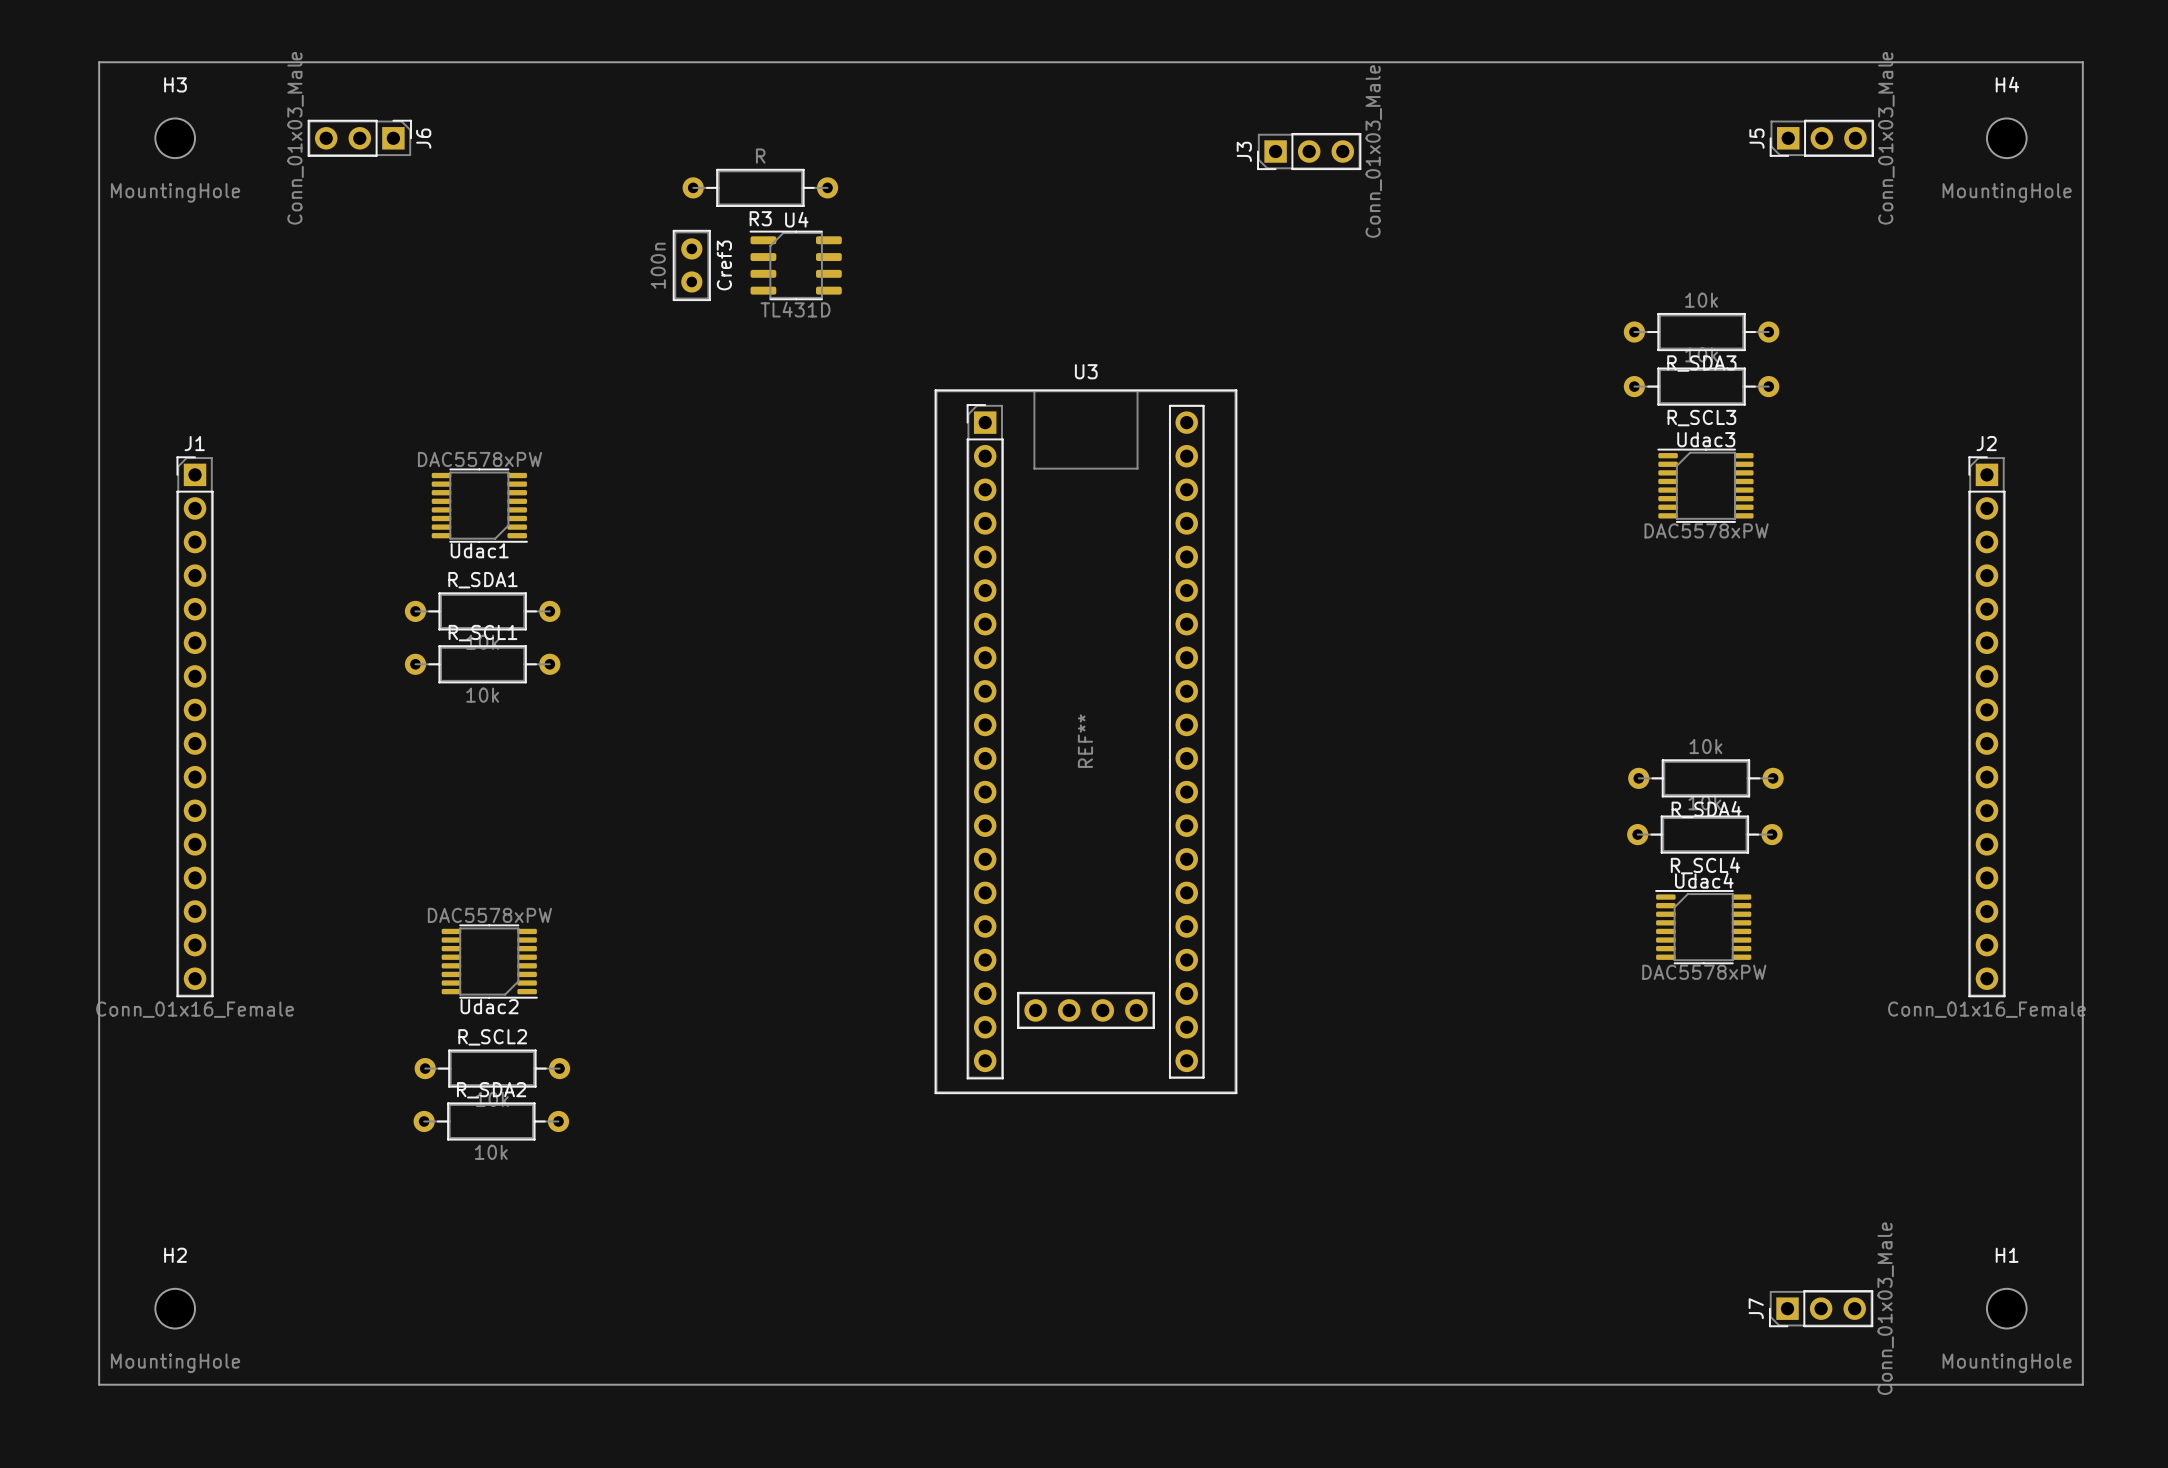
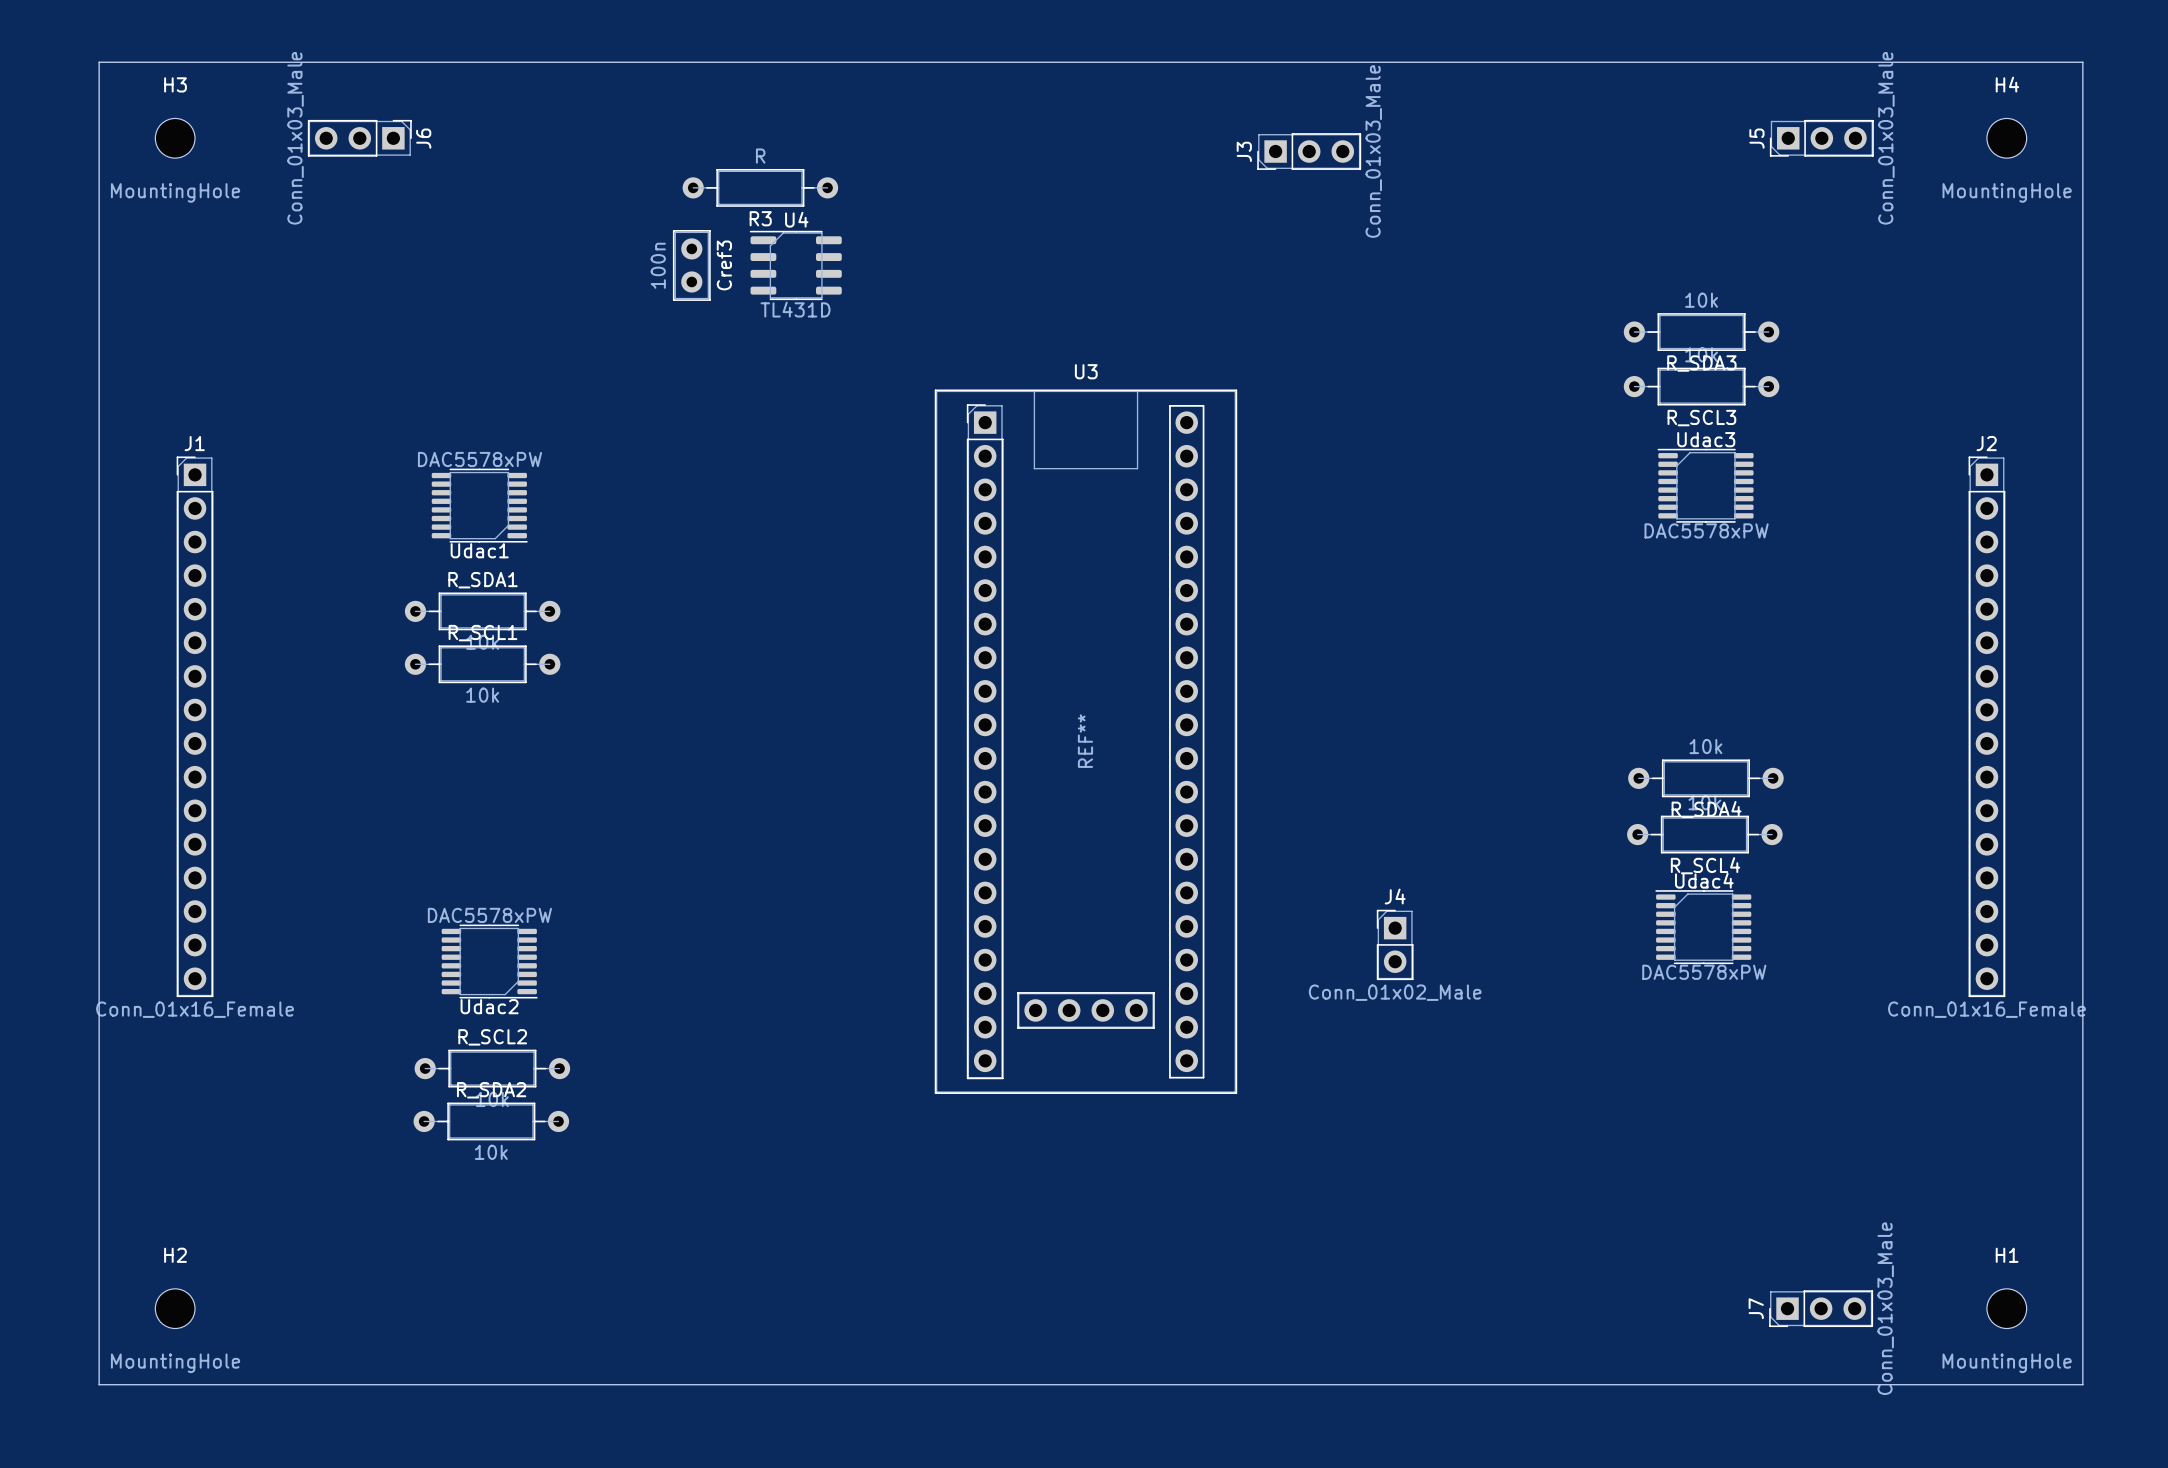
J4: none -> Conn_01x02_Male (1395, 944)

